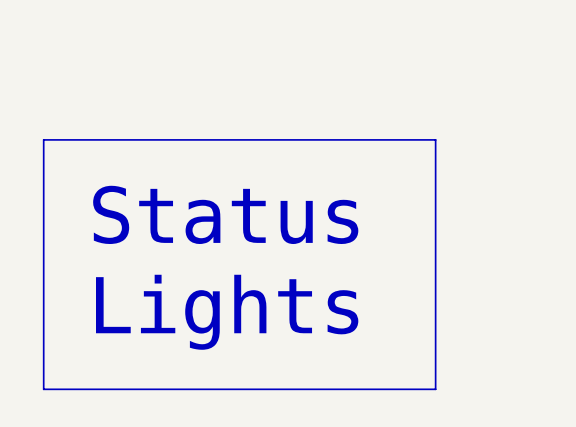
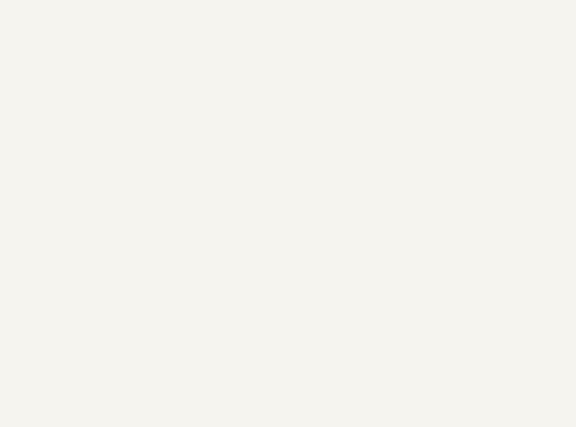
line: (43, 139) (435, 139) (435, 389) (43, 389) (43, 139) -> none
text: Status (225, 214) -> none
text: Lights (227, 312) -> none

